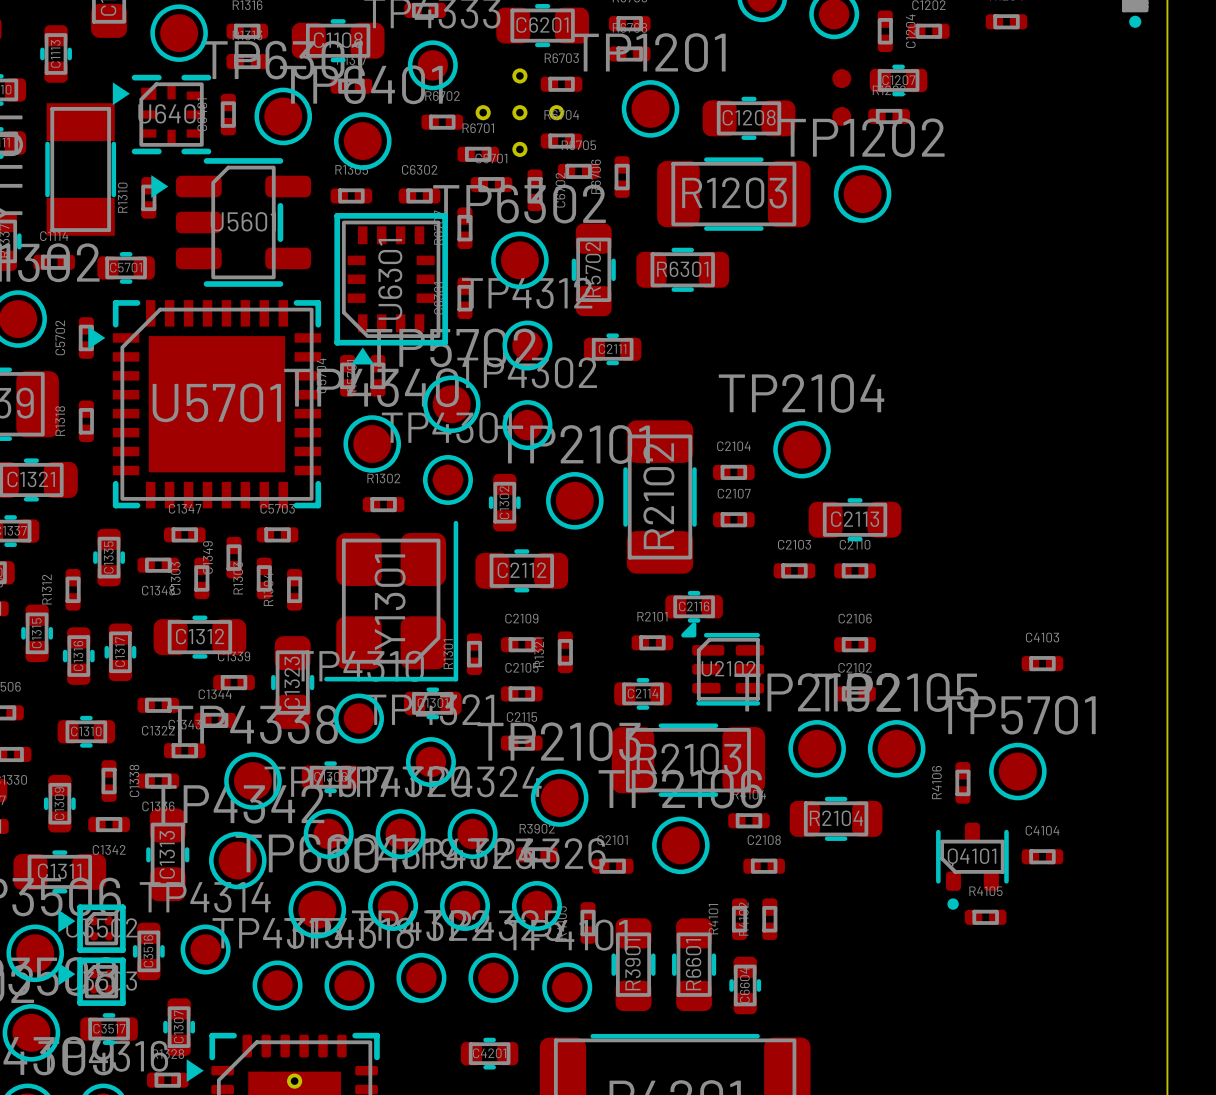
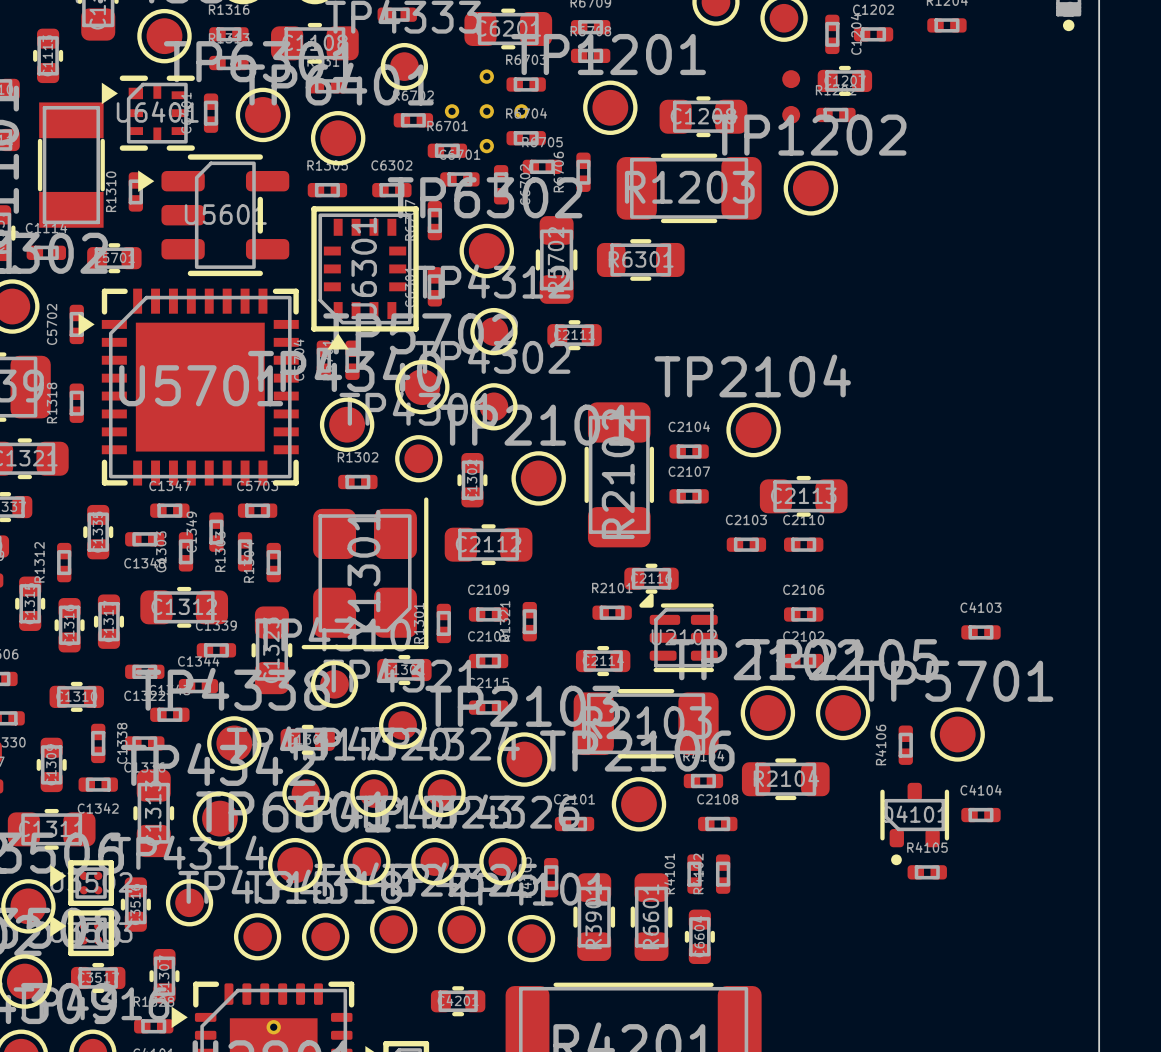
R3902: (536, 854) -> none

